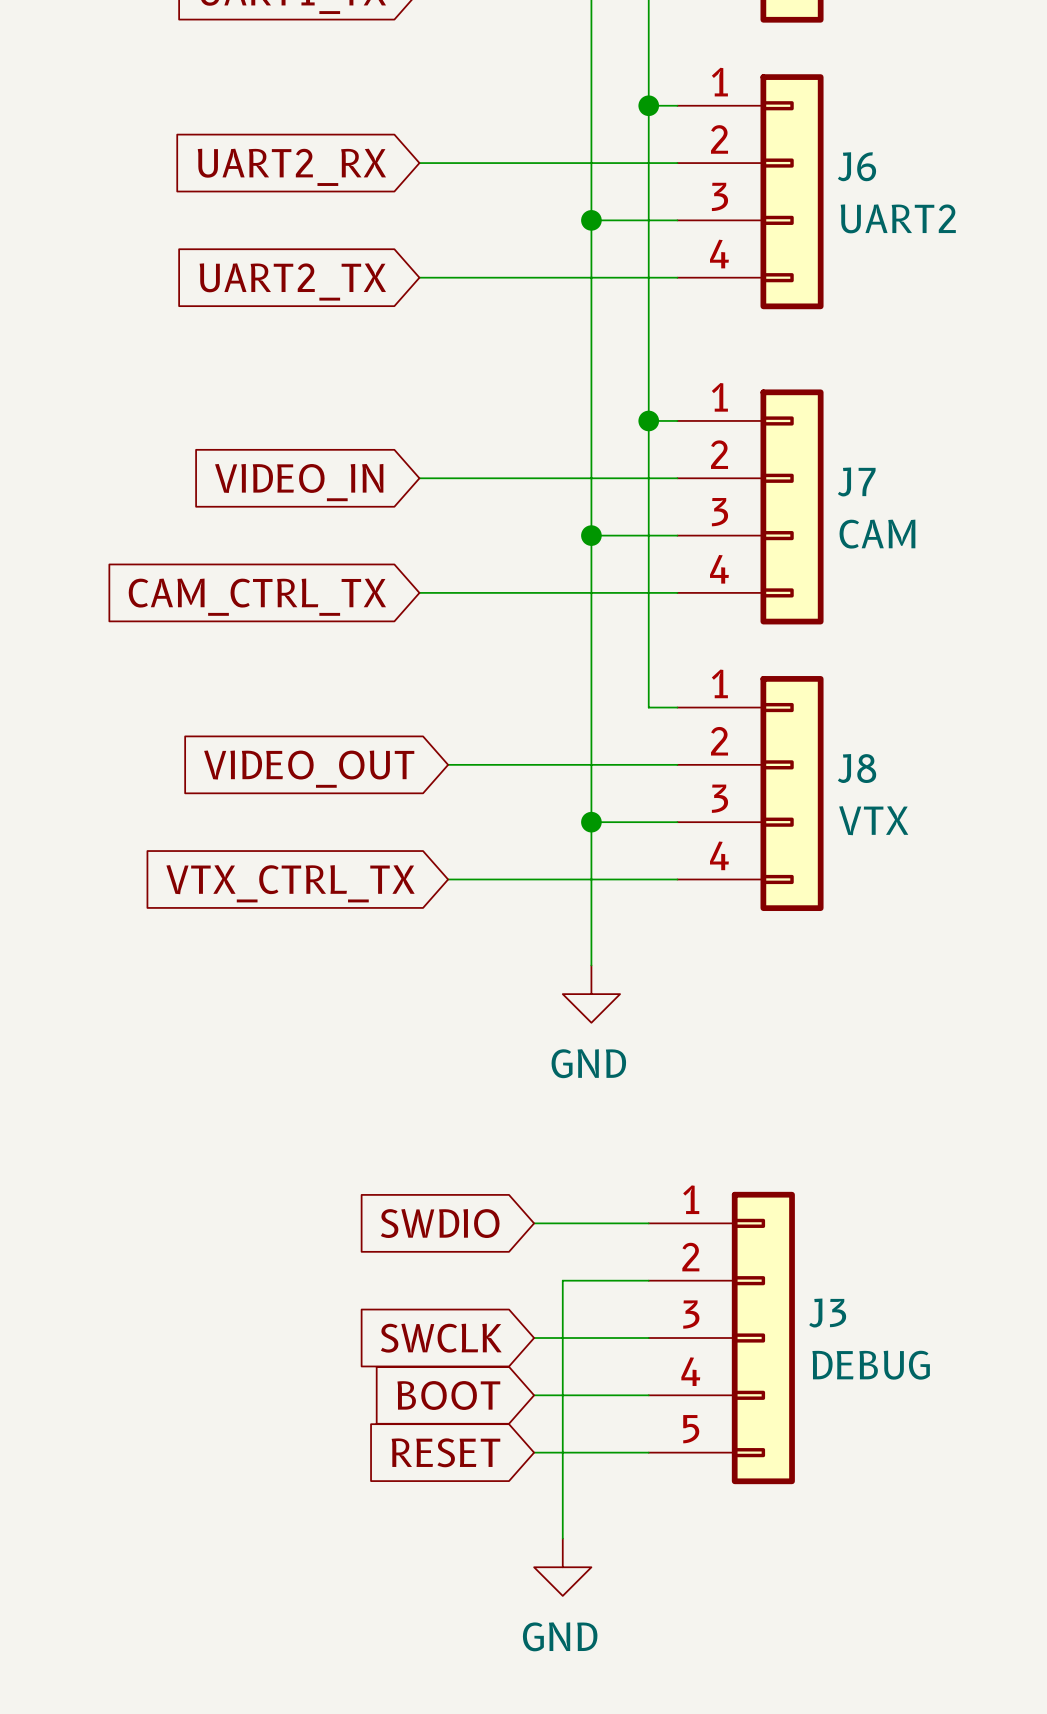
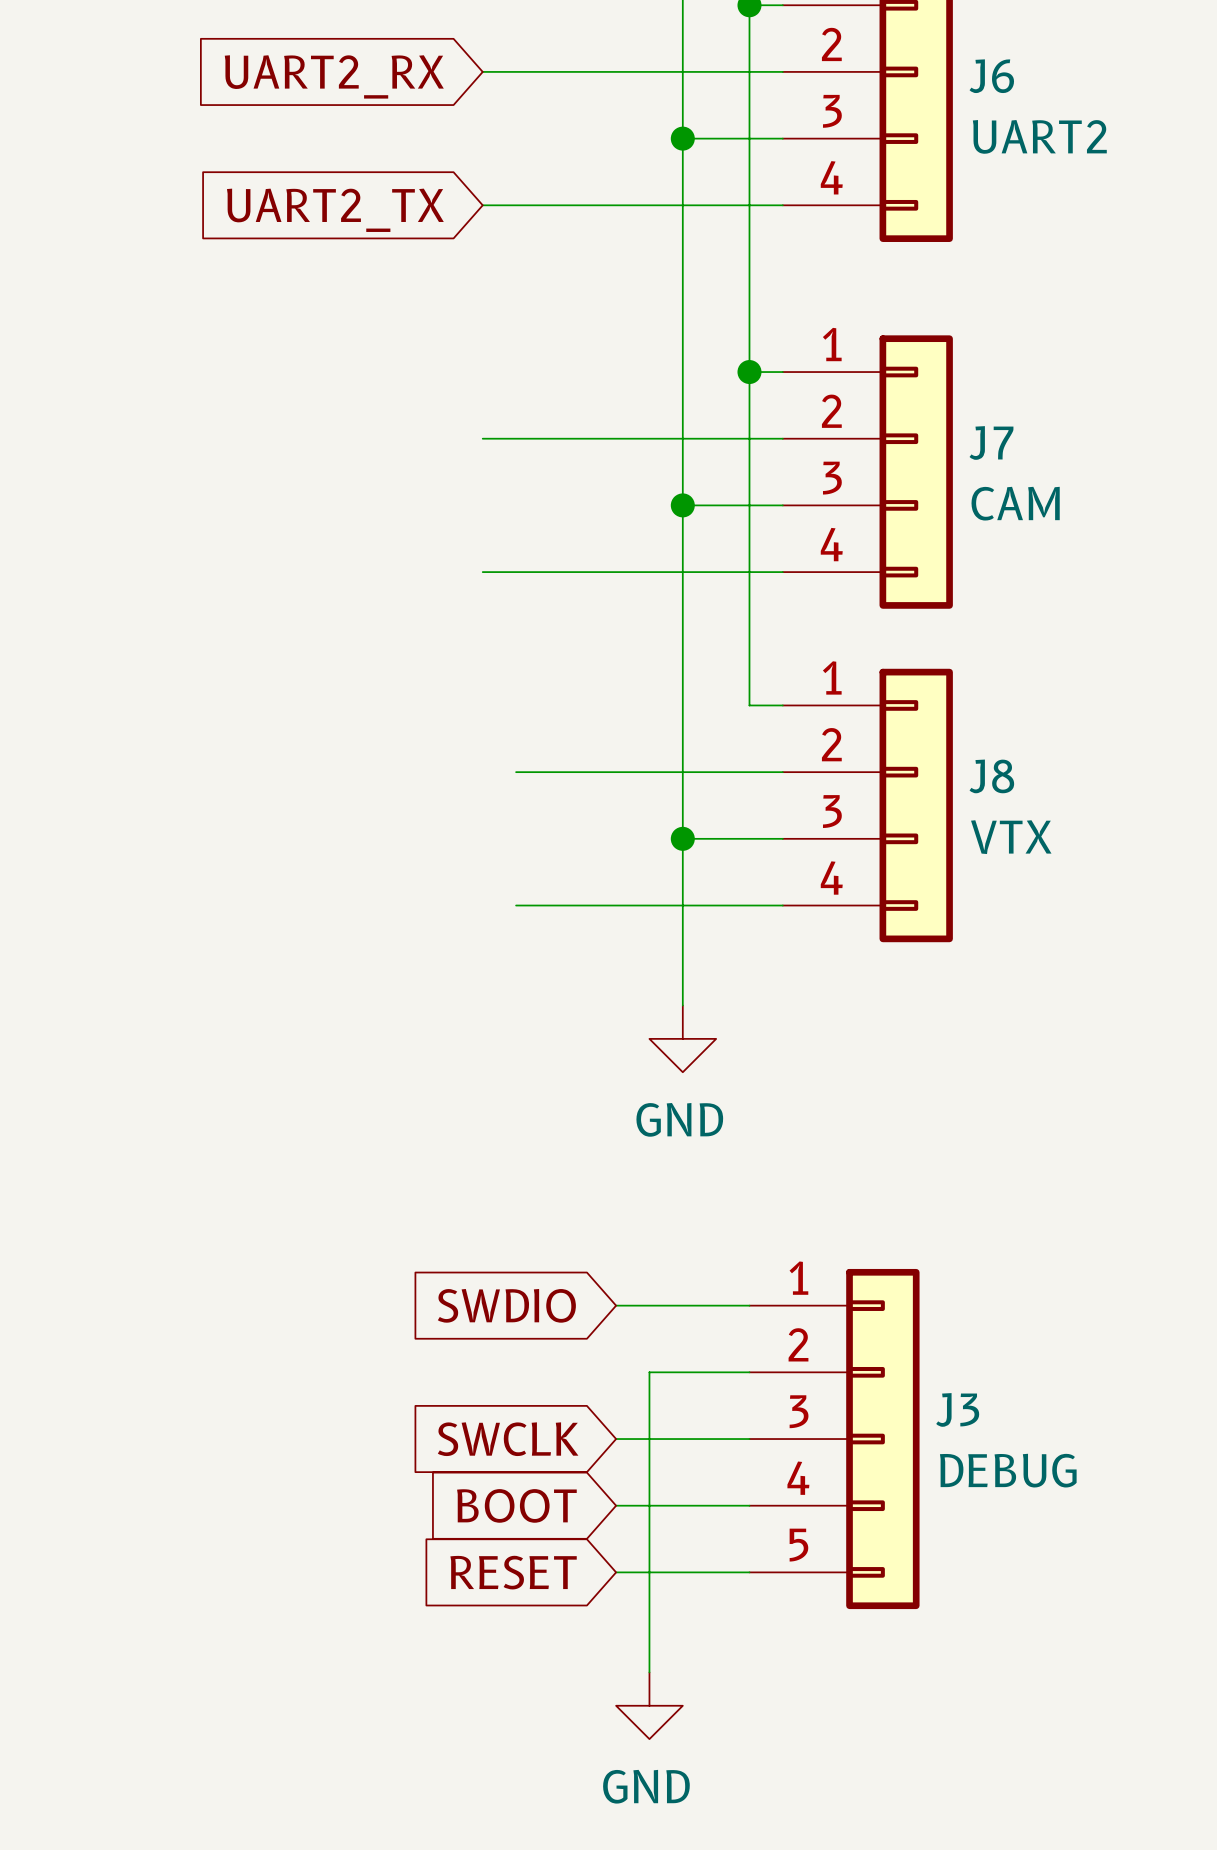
global label: VIDEO_IN (299, 482) -> none
global label: CAM_CTRL_TX (257, 597) -> none
global label: VIDEO_OUT (309, 769) -> none
global label: VTX_CTRL_TX (290, 883) -> none

